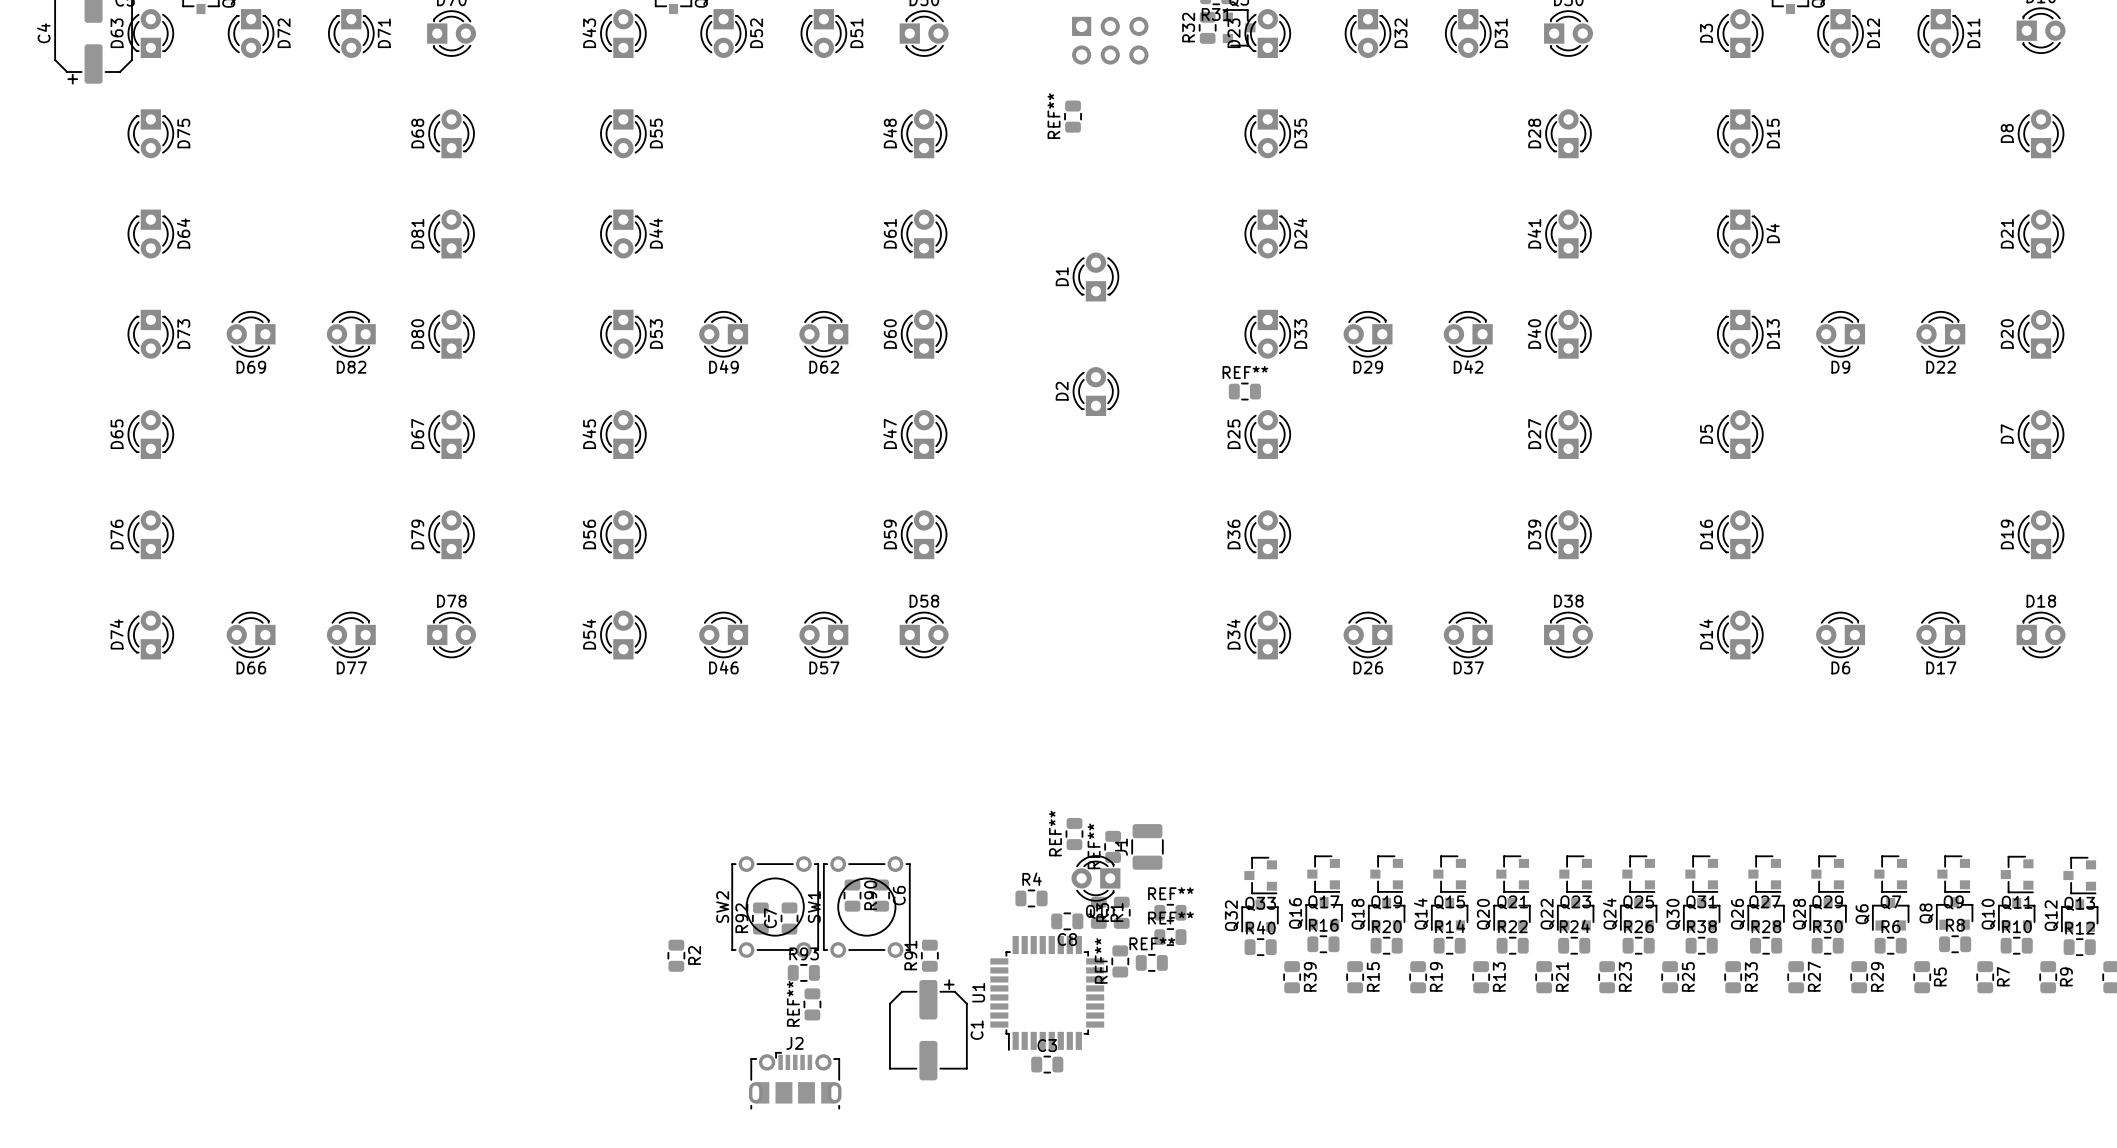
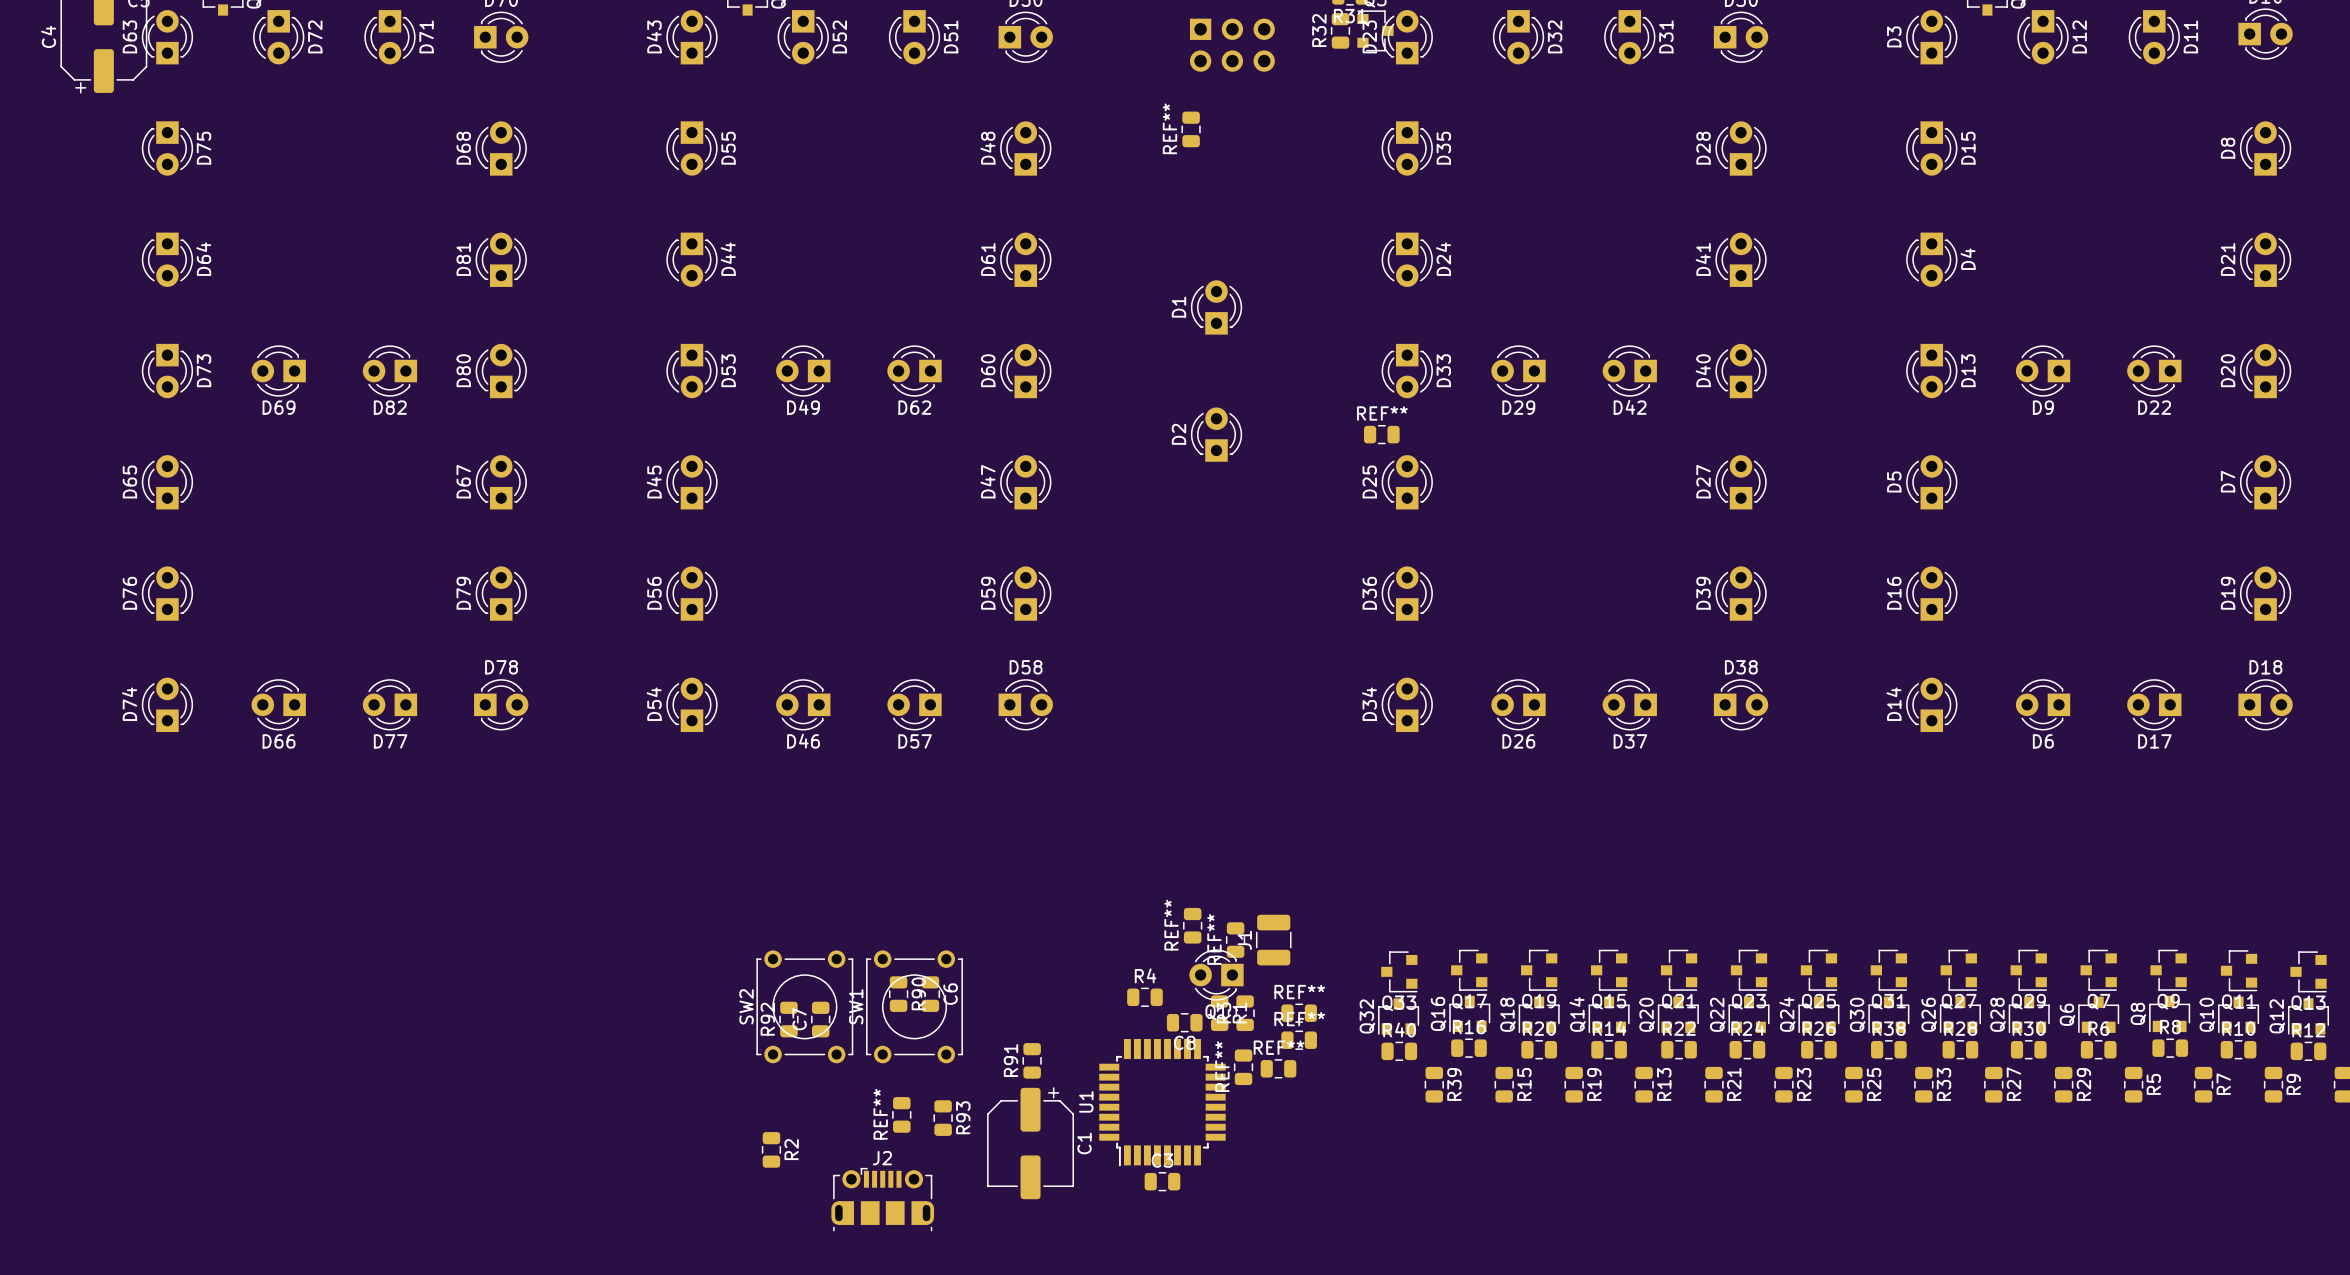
R90 position: (852, 895) -> (898, 994)
C6 position: (881, 895) -> (930, 994)
SW2 position: (775, 907) -> (804, 1006)
SW1 position: (866, 907) -> (914, 1006)
R92 position: (760, 918) -> (788, 1019)
C7 position: (789, 918) -> (820, 1019)
R2 position: (676, 955) -> (771, 1149)
R93 rotation: 0° (803, 972) -> 90° clockwise (943, 1118)
R93 position: (803, 972) -> (943, 1118)

